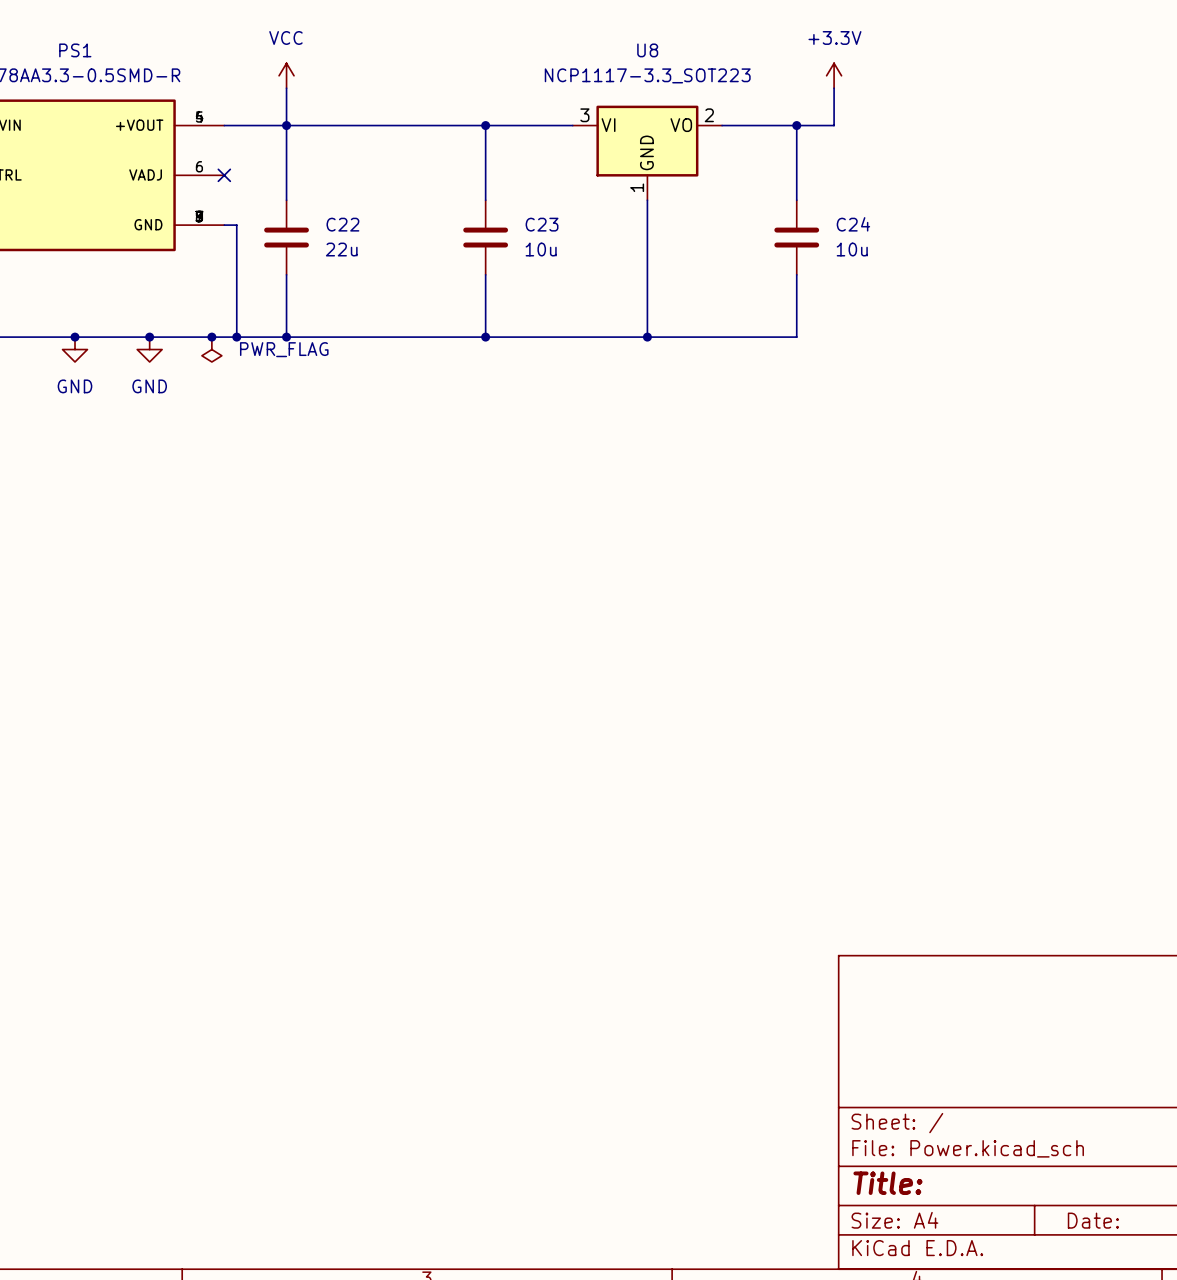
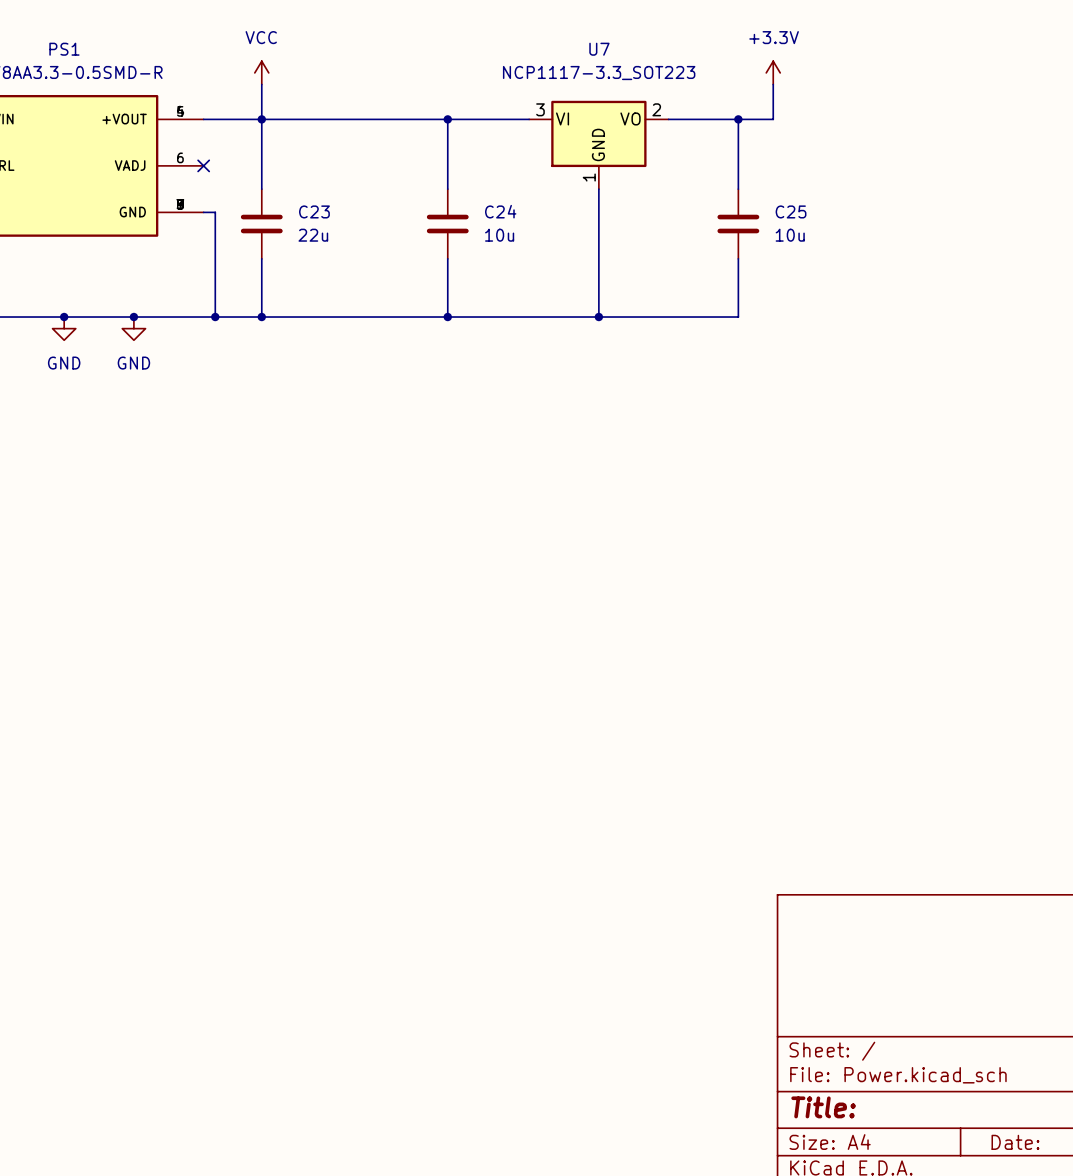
U8 name: U8 (647, 50) -> U7 (599, 49)
C22 name: C22 (342, 224) -> C23 (314, 211)
C23 name: C23 (542, 224) -> C24 (500, 211)
C24 name: C24 (853, 224) -> C25 (791, 211)
junction: (211, 337) -> none
power symbol: PWR_FLAG (211, 349) -> none

